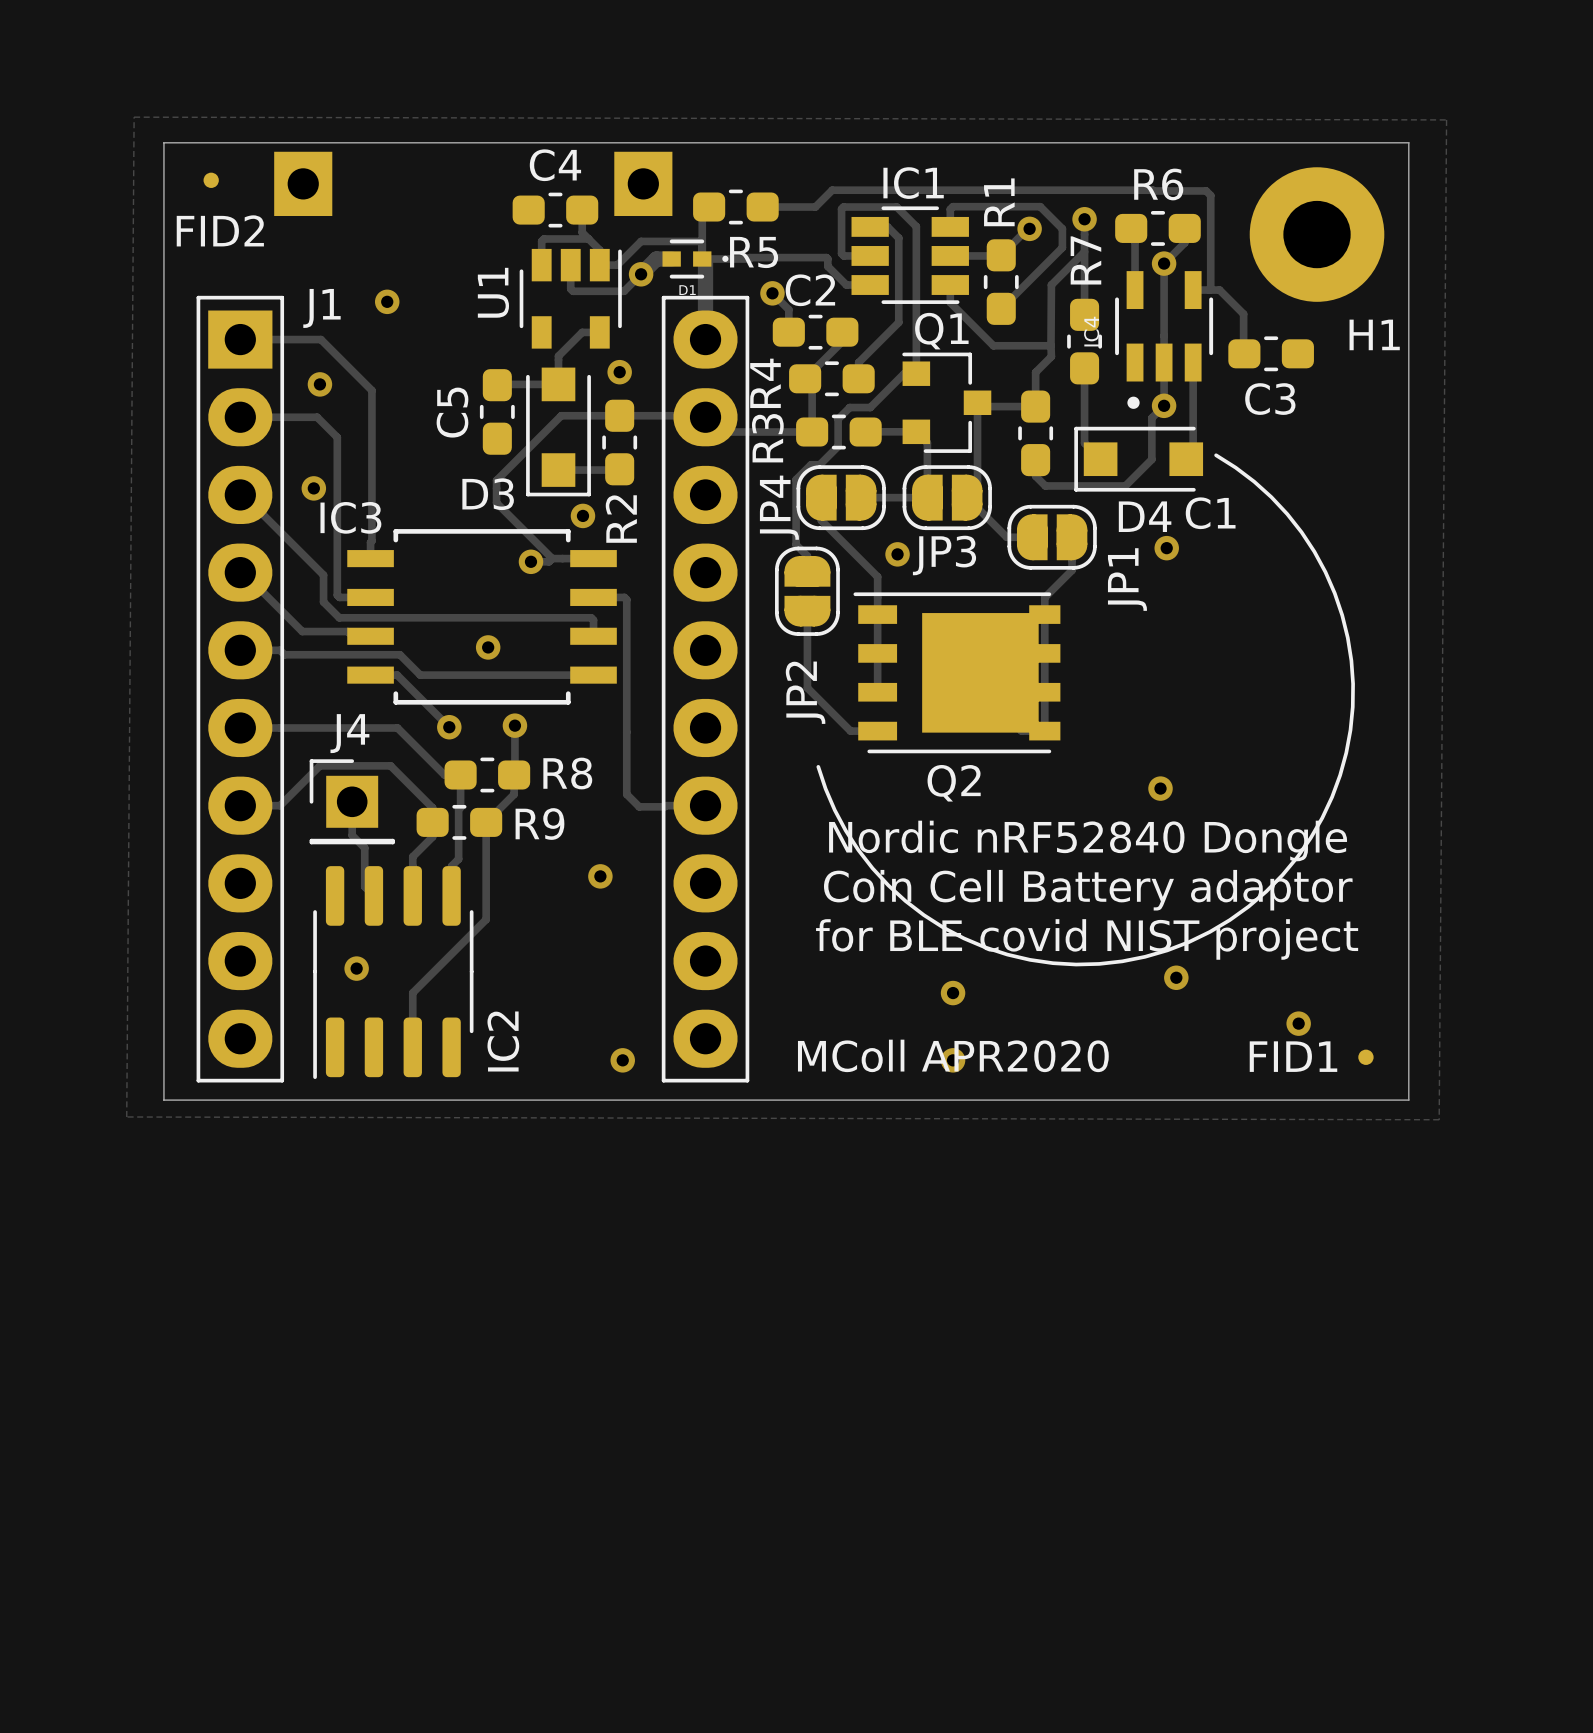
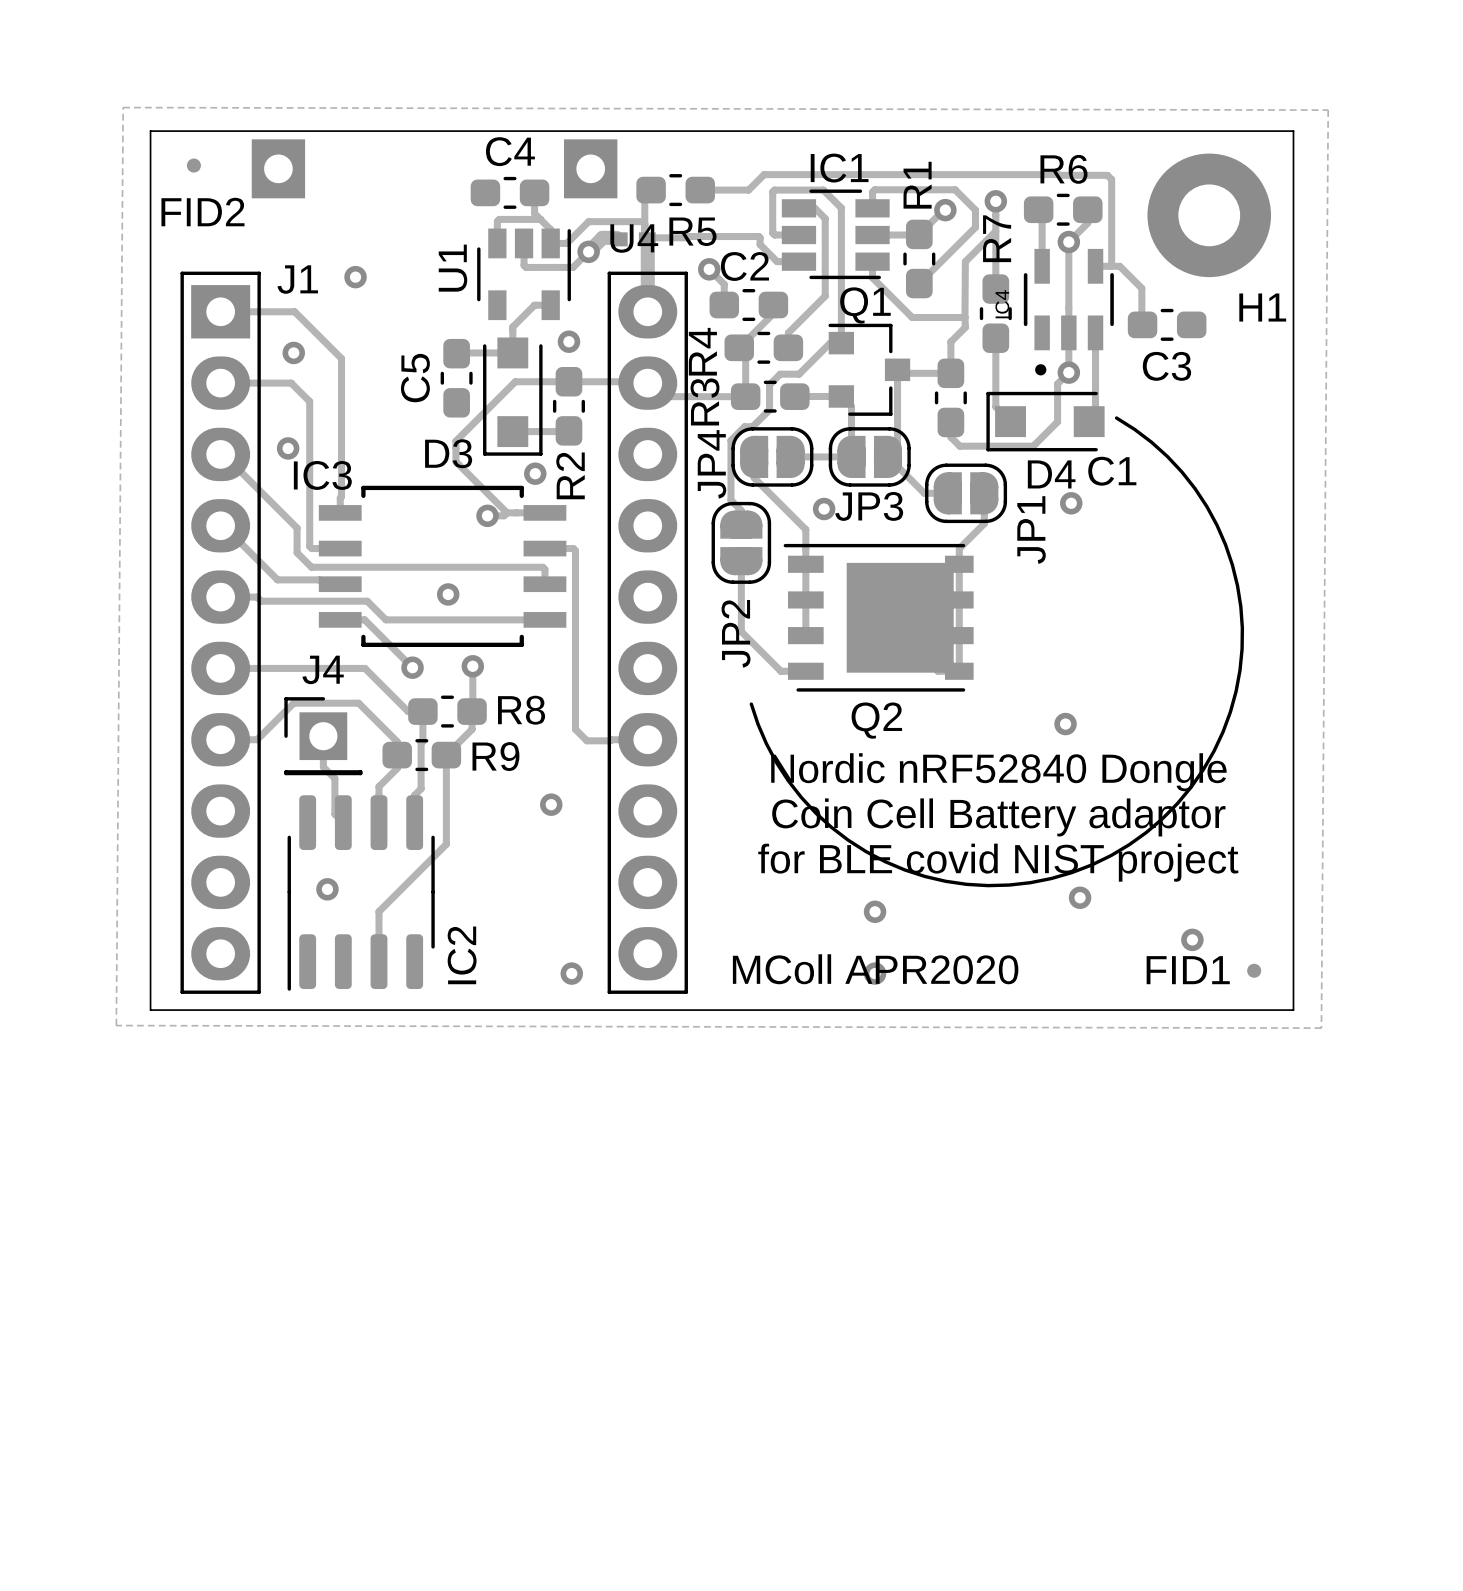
D1: (695, 259) -> none
U4: none -> (633, 239)

